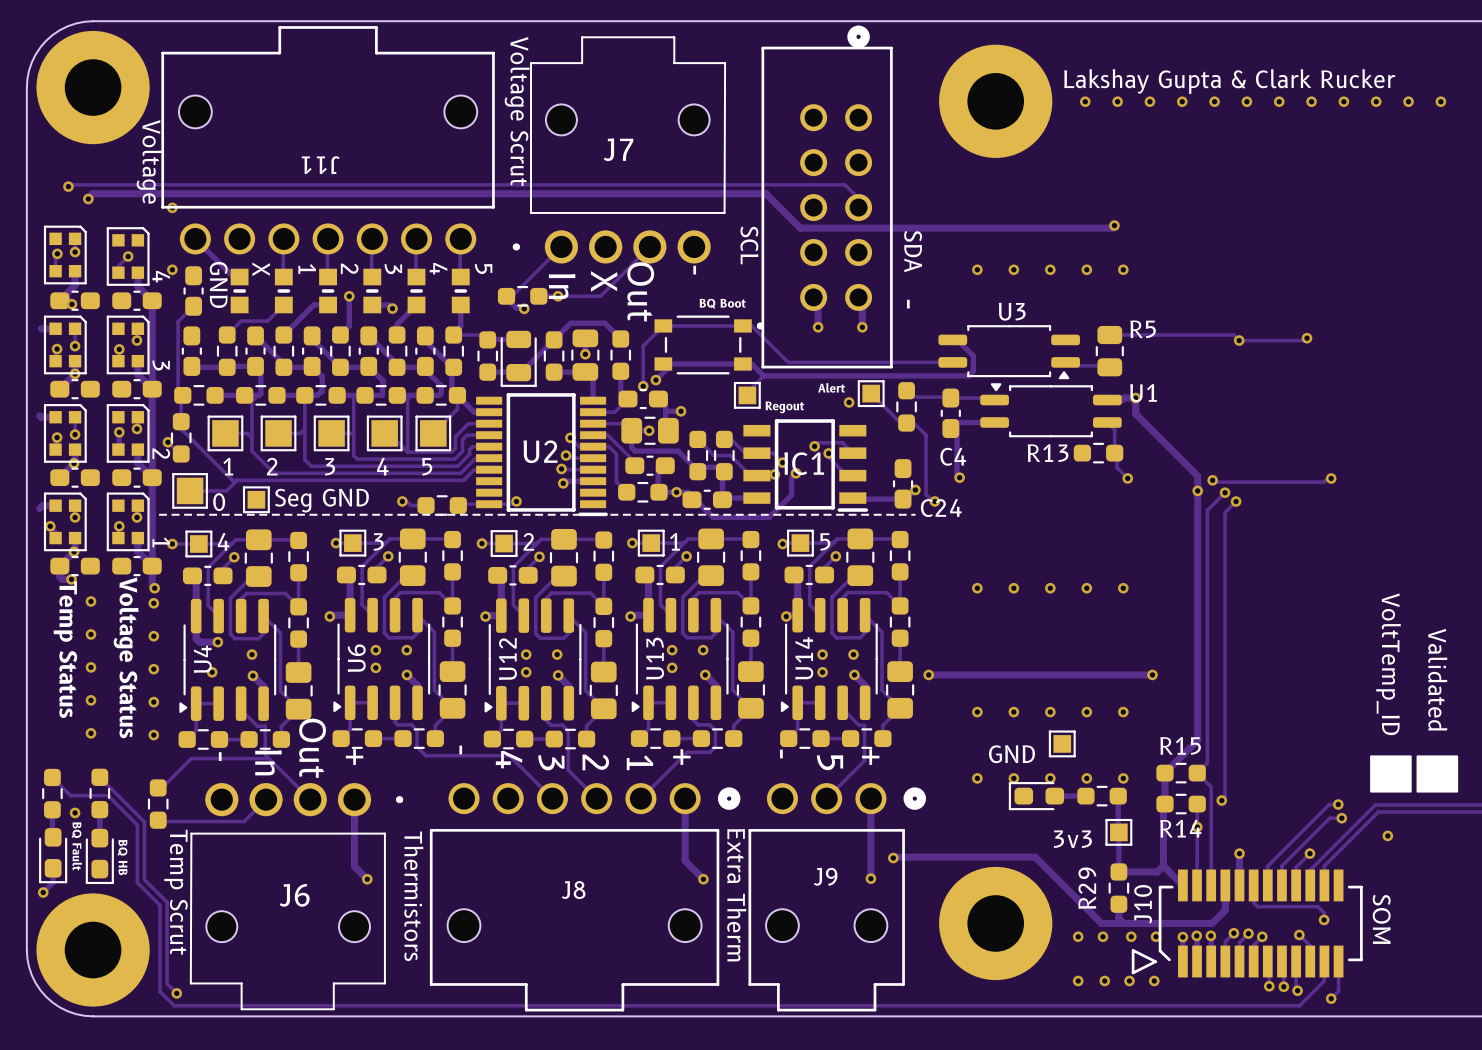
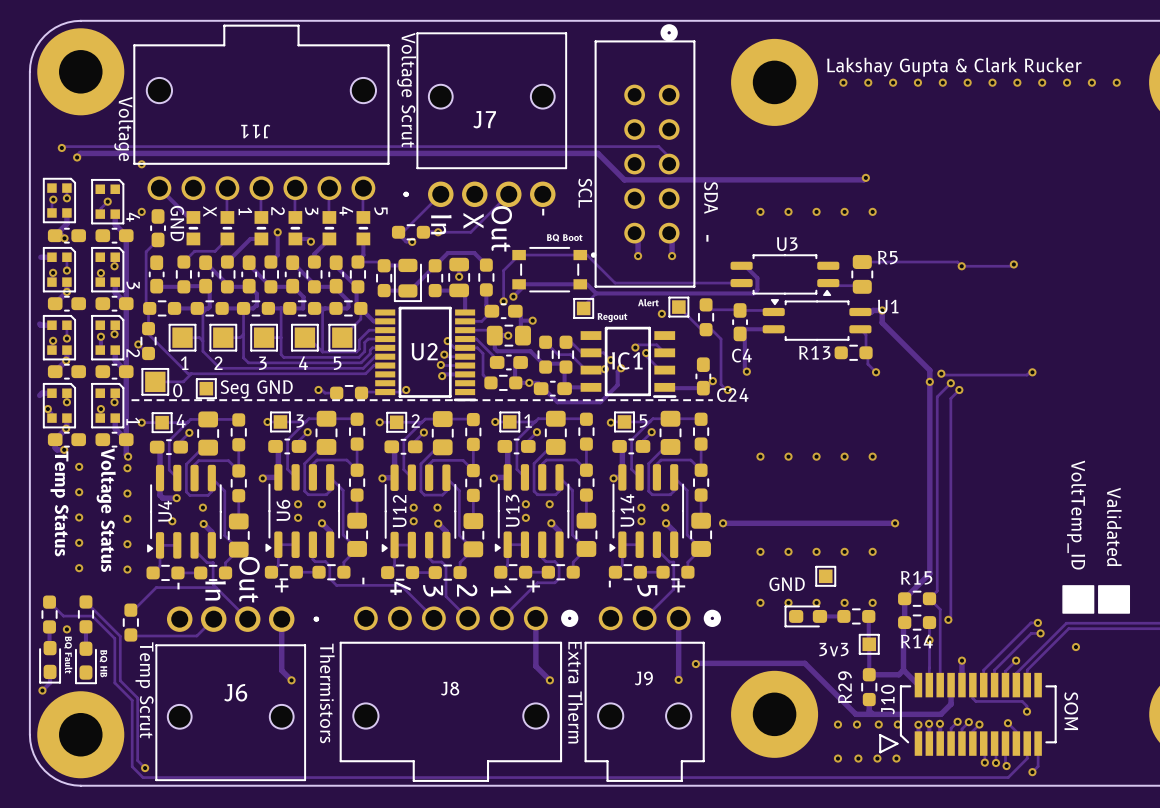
J7 footprint: [512, 36, 726, 264] -> [403, 32, 567, 208]
J6 footprint: [189, 783, 404, 1011] -> [155, 606, 320, 781]

